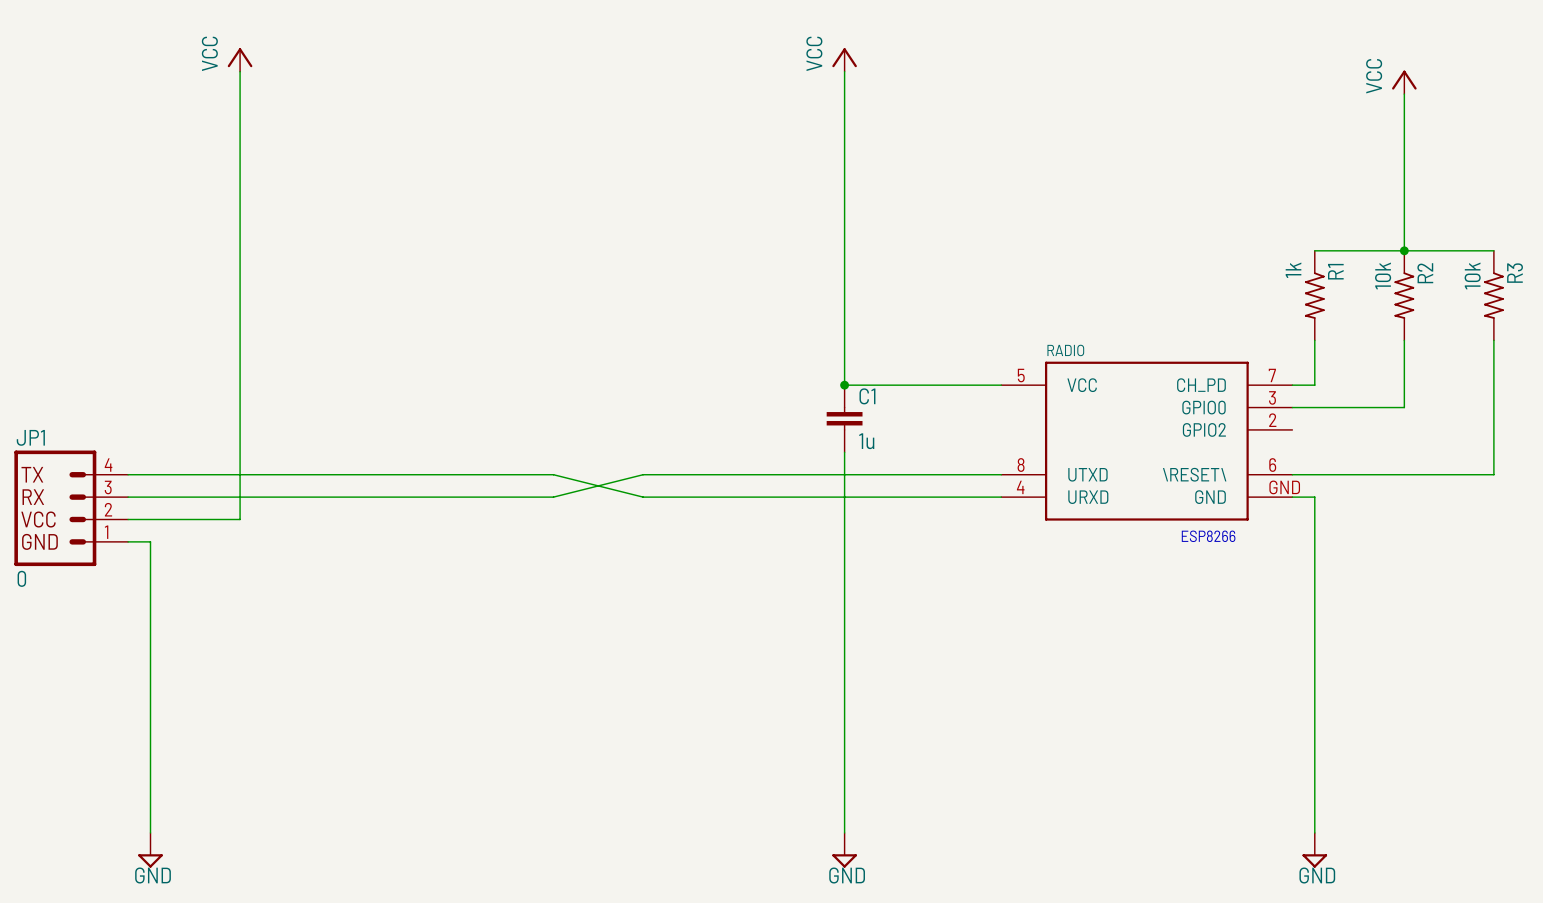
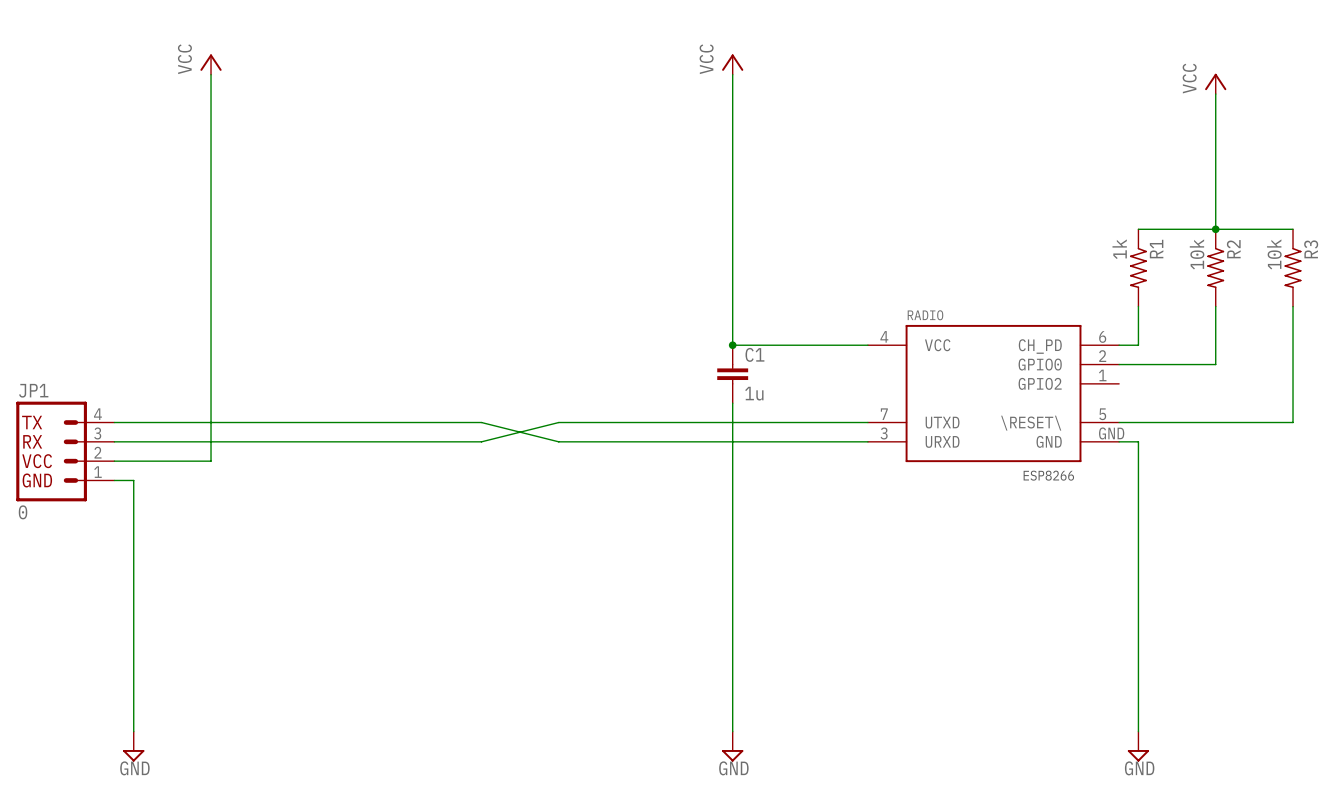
RADIO pin number: 5 (1021, 375) -> 4 (884, 336)
RADIO pin number: 7 (1272, 375) -> 6 (1102, 336)
RADIO pin number: 3 (1272, 397) -> 2 (1102, 356)
RADIO pin number: 2 (1272, 420) -> 1 (1102, 375)
RADIO pin number: 8 (1021, 465) -> 7 (884, 414)
RADIO pin number: 6 (1272, 465) -> 5 (1102, 414)
RADIO pin number: 4 (1020, 487) -> 3 (884, 433)

